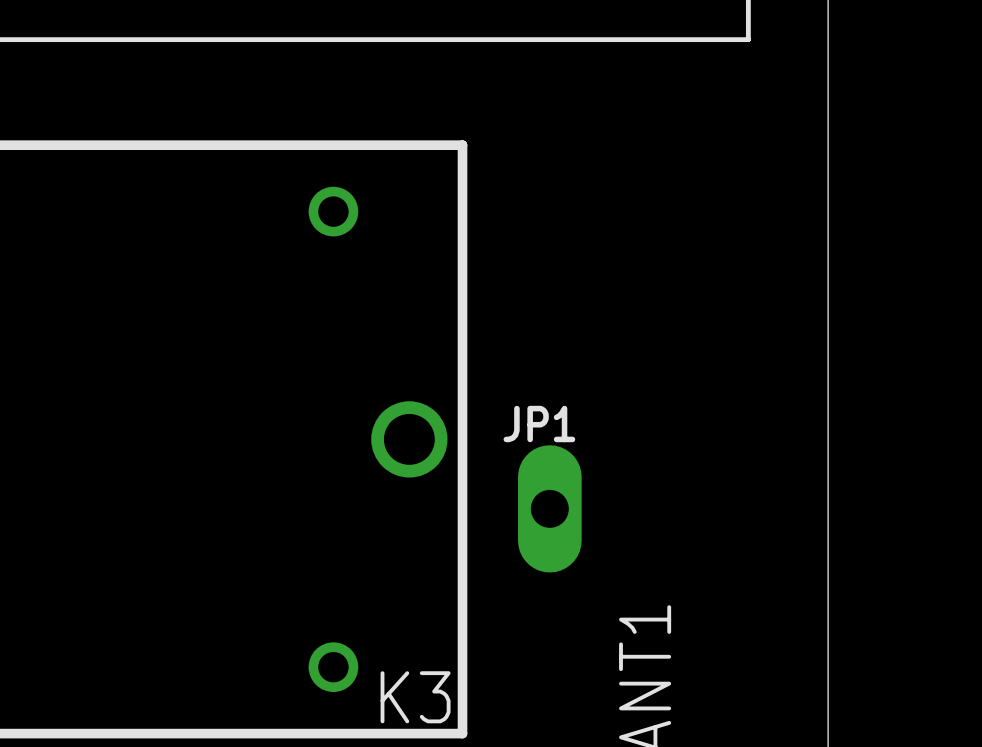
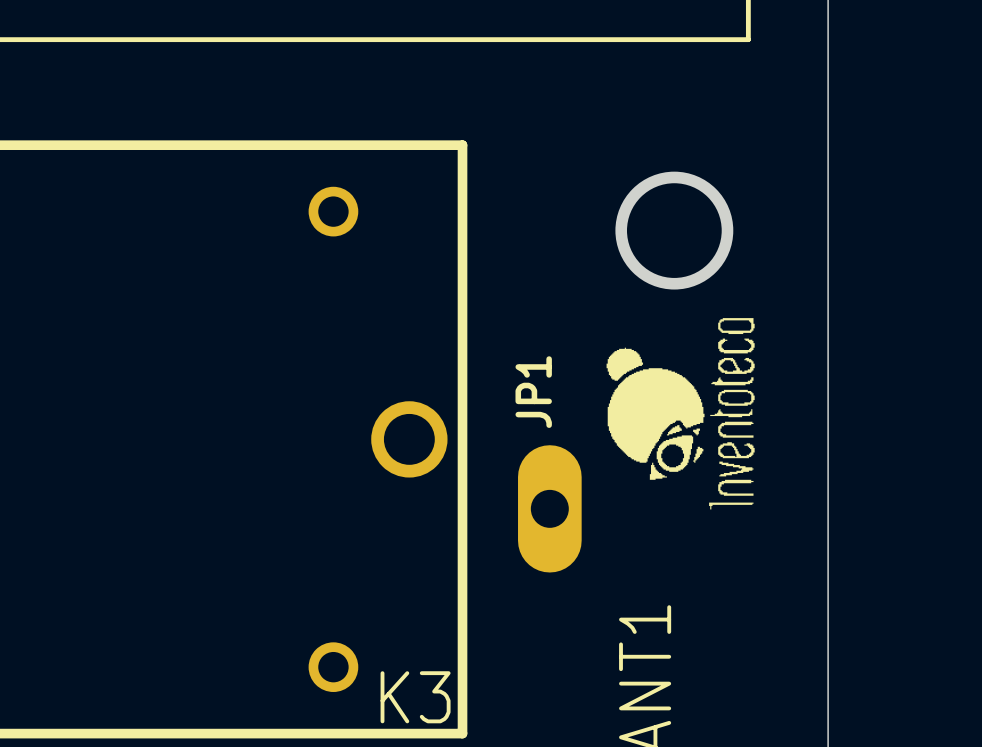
round board edge: none -> [615, 171, 734, 290]
drawing: none -> [606, 318, 755, 510]
JP1 name rotation: 0° (539, 424) -> 90° counterclockwise (533, 392)

